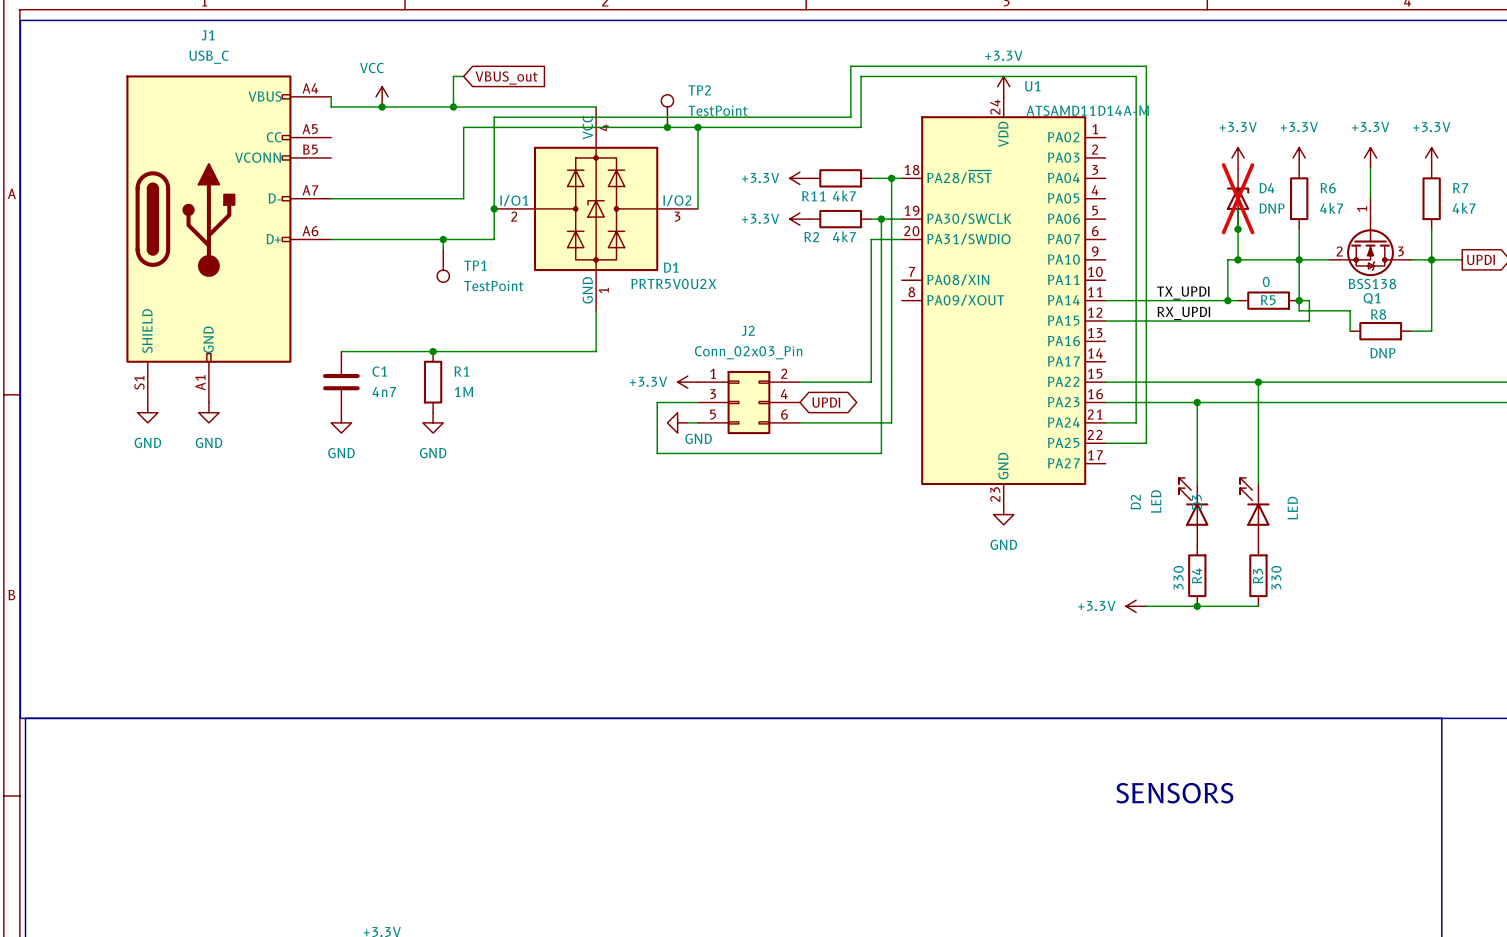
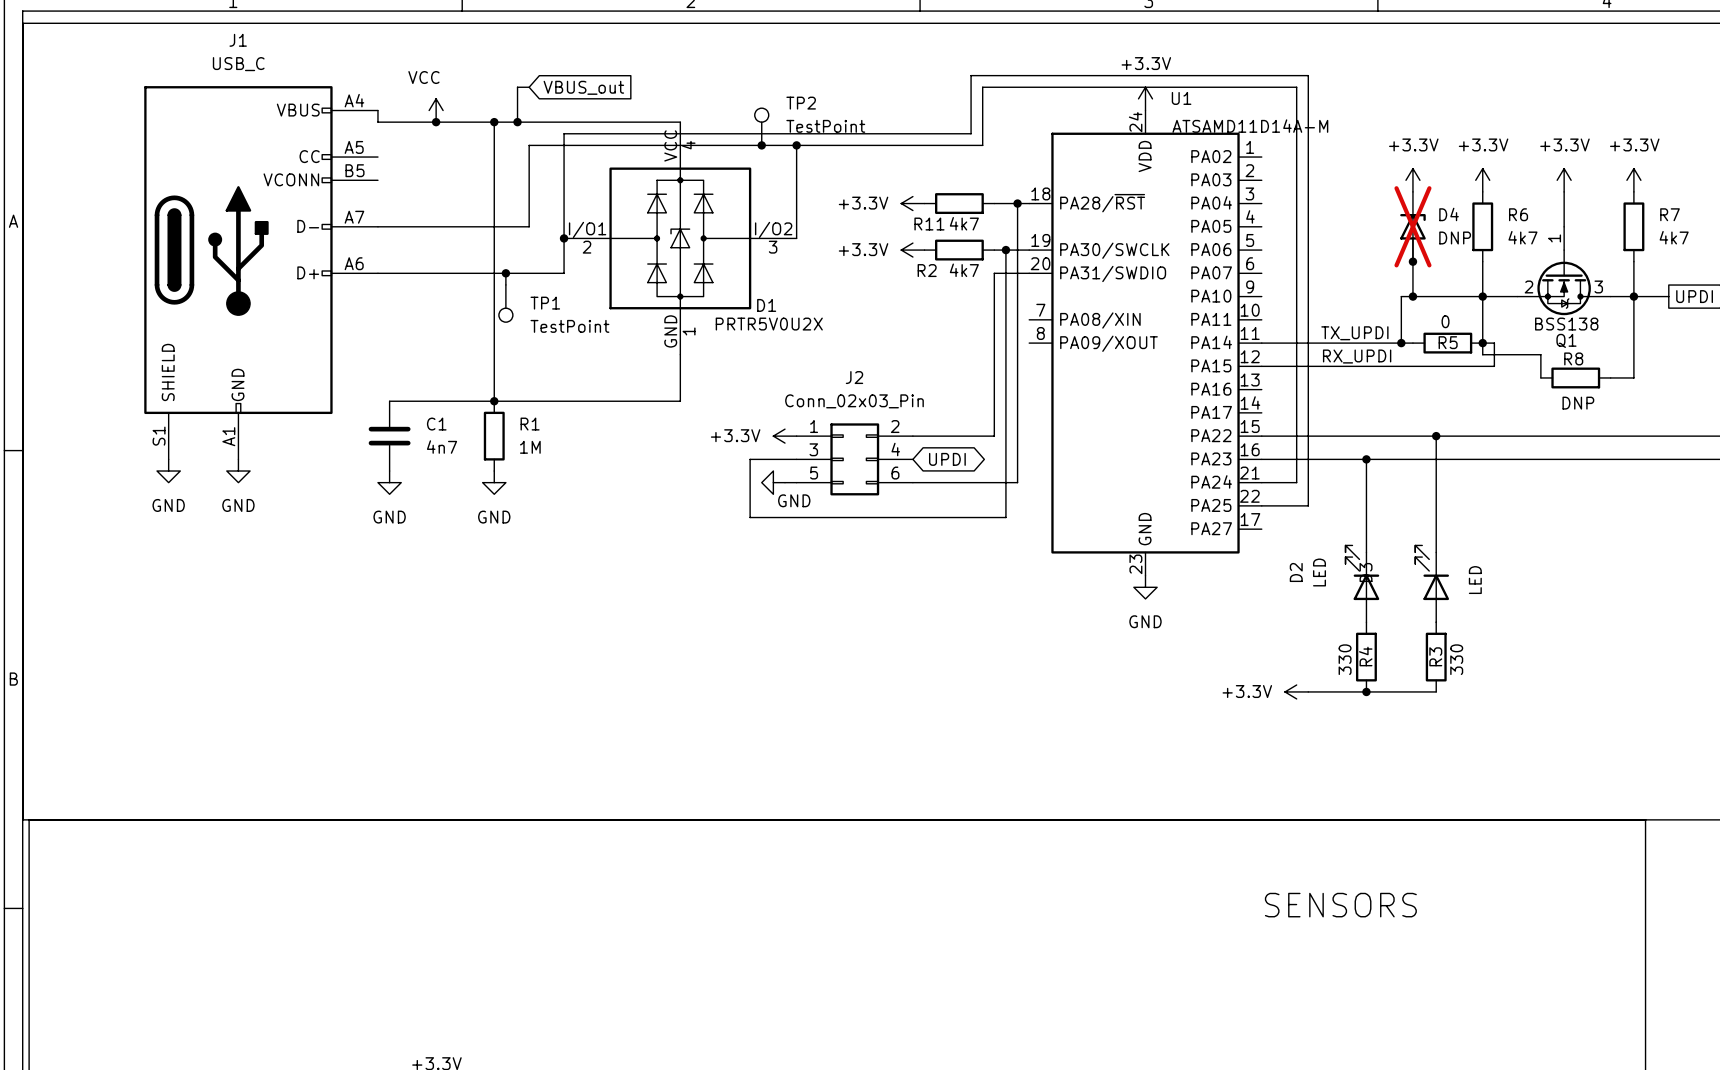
wire: none -> (494, 122) (494, 401)
junction: none -> (494, 122)

